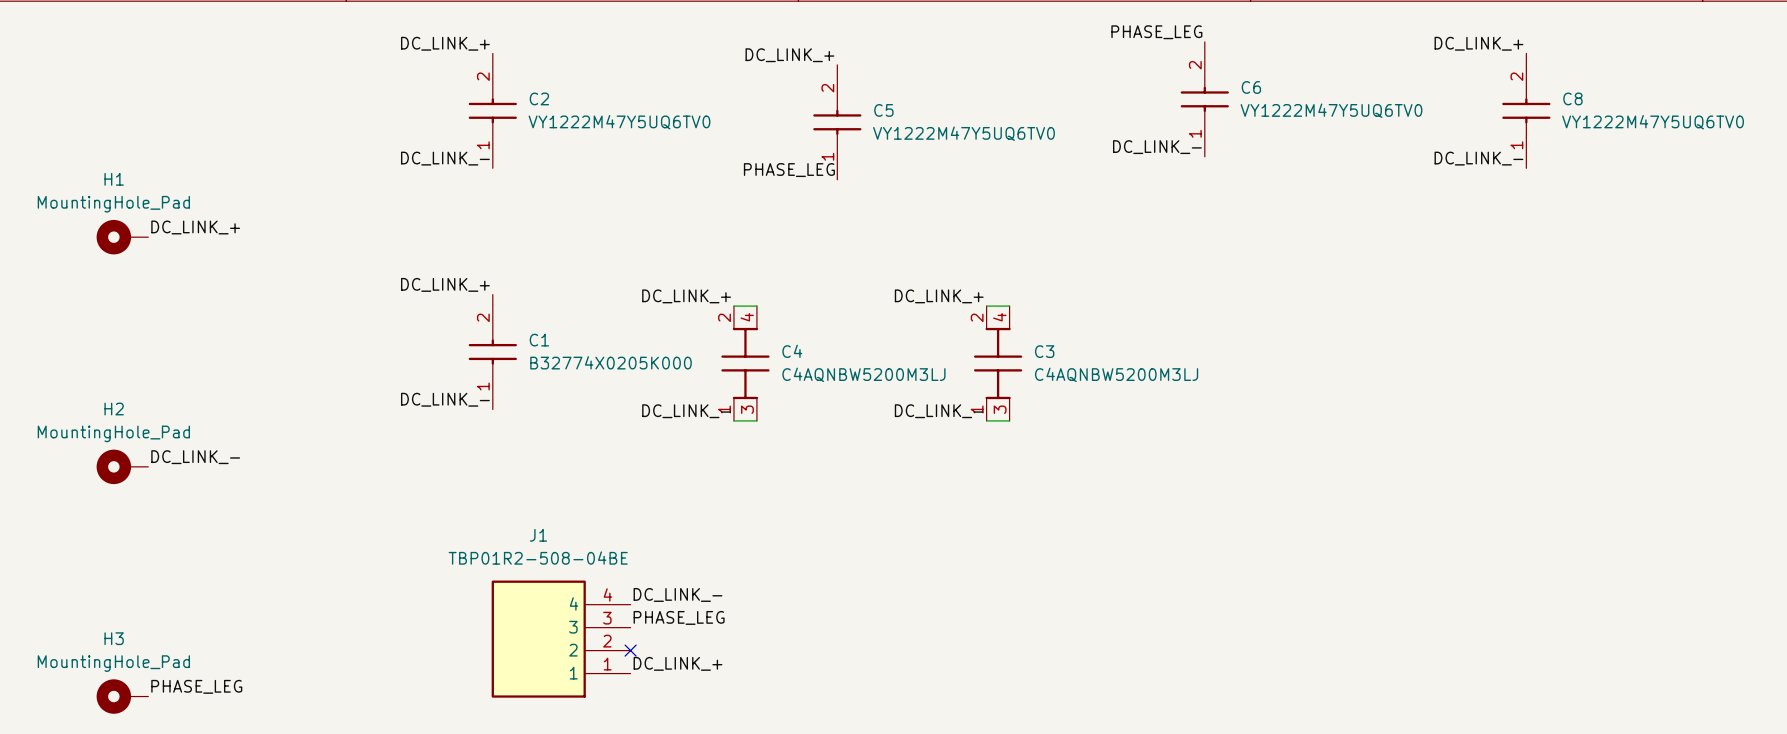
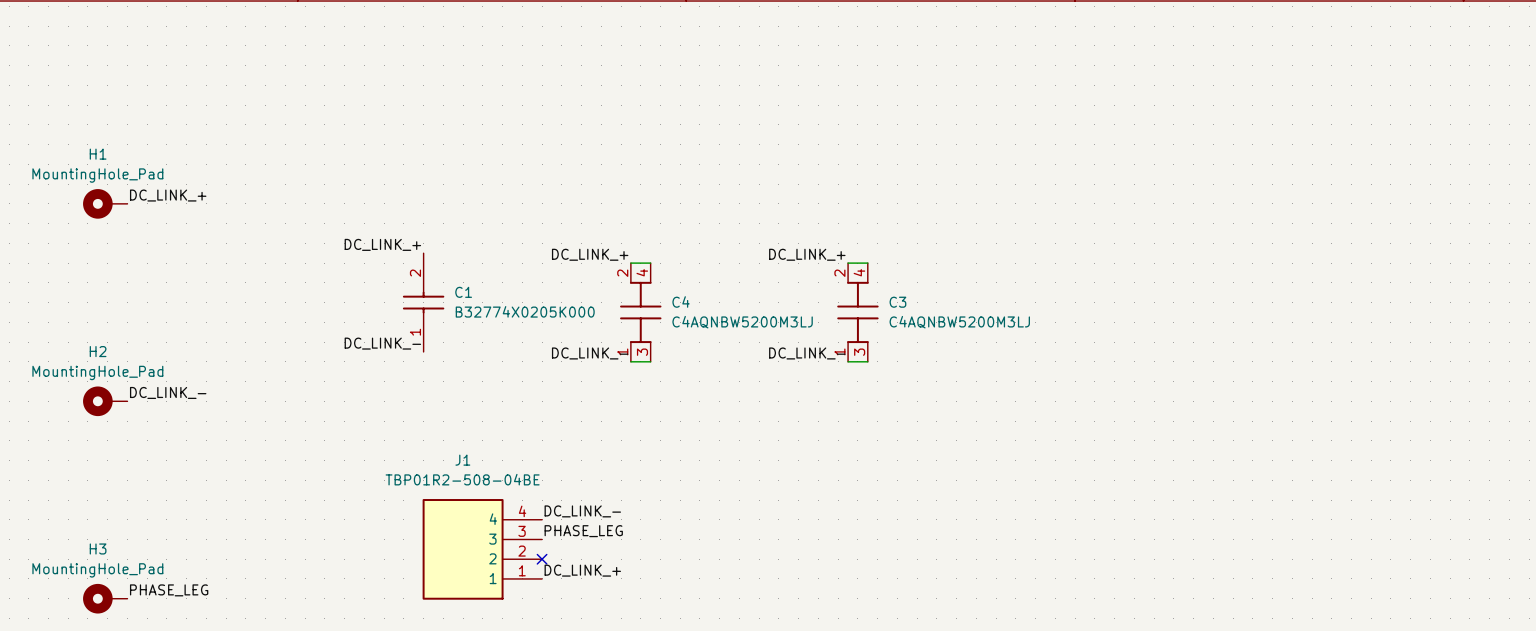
label: PHASE_LEG (1156, 32) -> none
label: DC_LINK_+ (445, 43) -> none
label: DC_LINK_+ (1478, 43) -> none
label: DC_LINK_+ (789, 55) -> none
C6: VY1222M47Y5UQ6TV0 (1204, 99) -> none
C2: VY1222M47Y5UQ6TV0 (492, 110) -> none
C8: VY1222M47Y5UQ6TV0 (1526, 110) -> none
C5: VY1222M47Y5UQ6TV0 (837, 122) -> none
label: DC_LINK_- (1157, 147) -> none
label: DC_LINK_- (445, 158) -> none
label: DC_LINK_- (1478, 158) -> none
label: PHASE_LEG (789, 170) -> none

